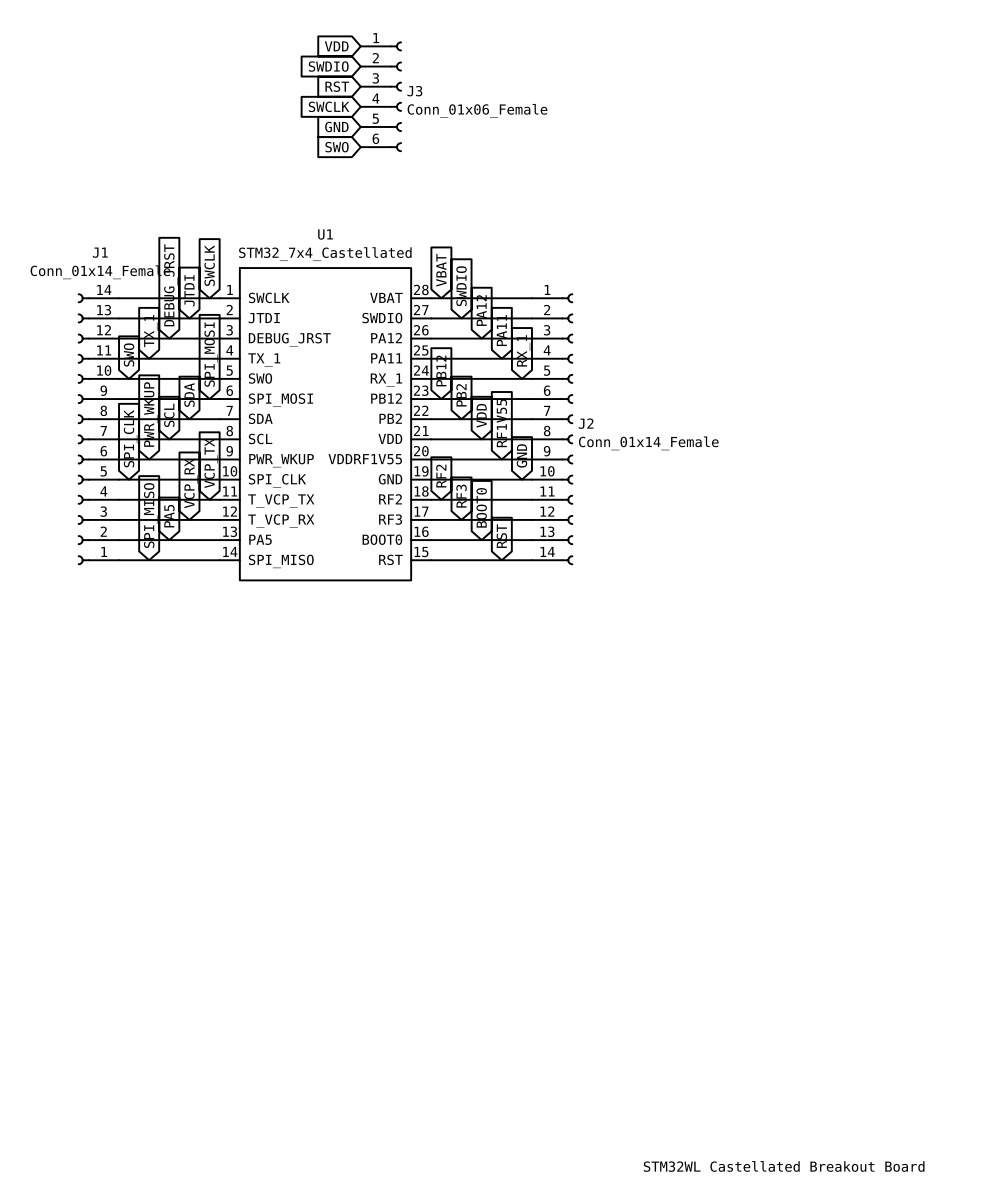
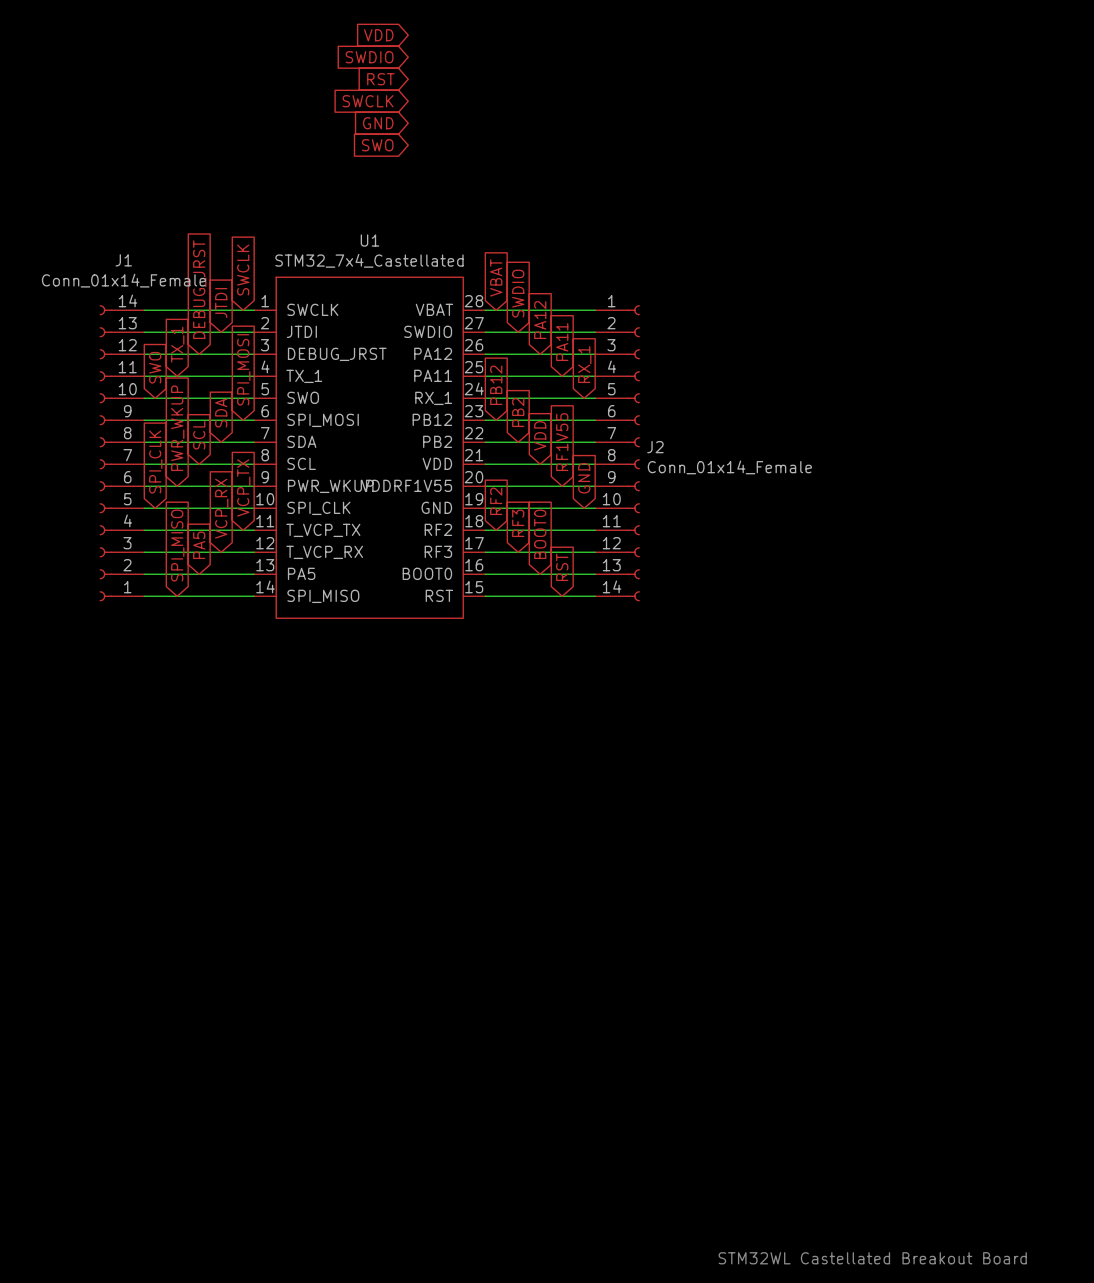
J3: Conn_01x06_Female (381, 96) -> none

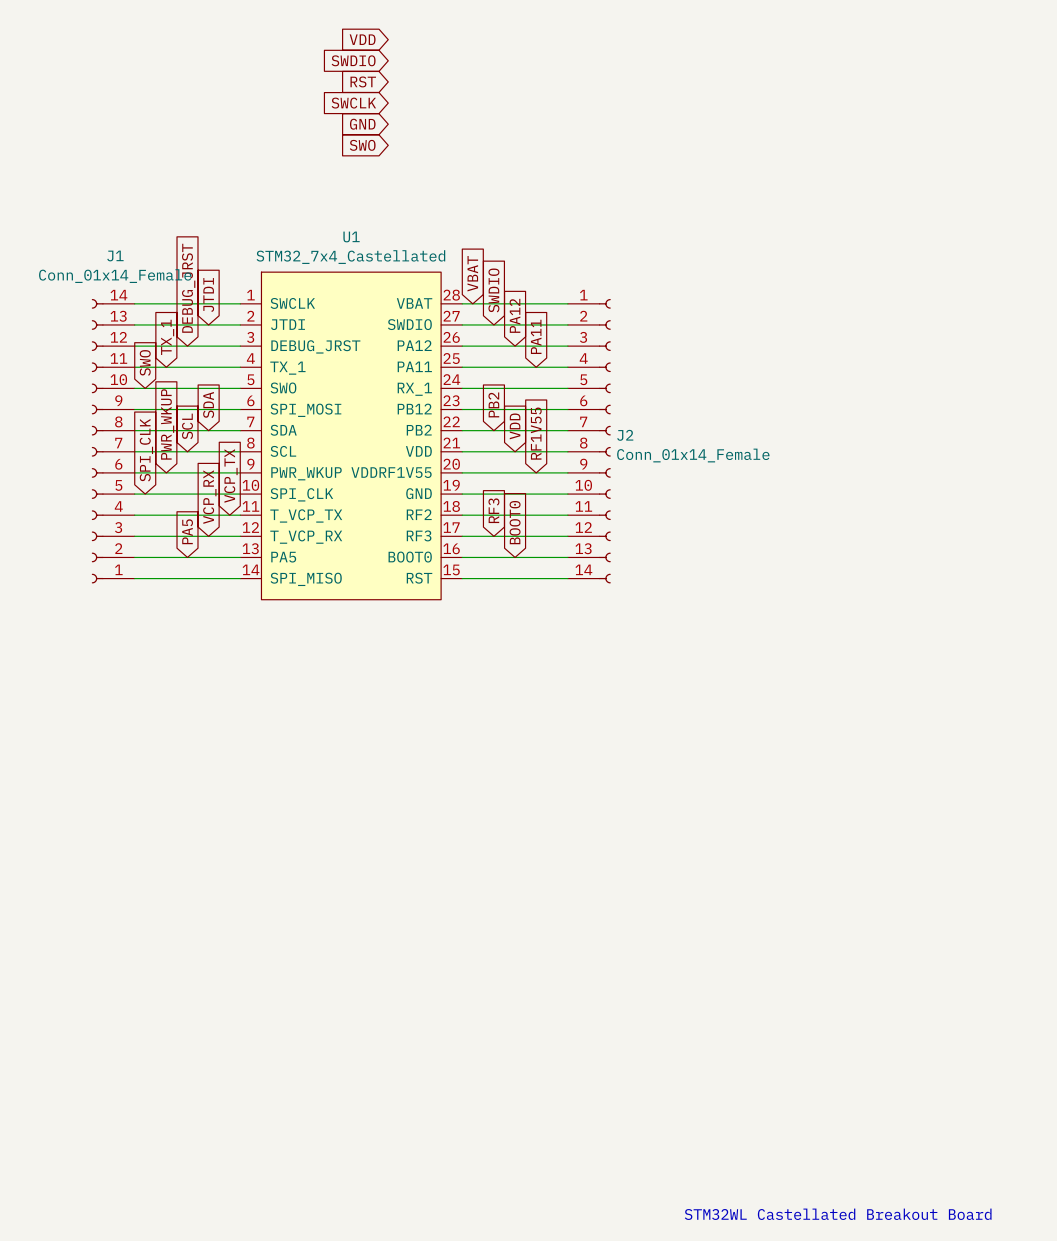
global label: SWCLK (243, 270) -> none
global label: RX_1 (584, 364) -> none
global label: SPI_MOSI (243, 369) -> none
global label: PB12 (496, 385) -> none
global label: GND (584, 478) -> none
global label: RF2 (496, 501) -> none
global label: SPI_MISO (177, 545) -> none
global label: RST (562, 567) -> none

